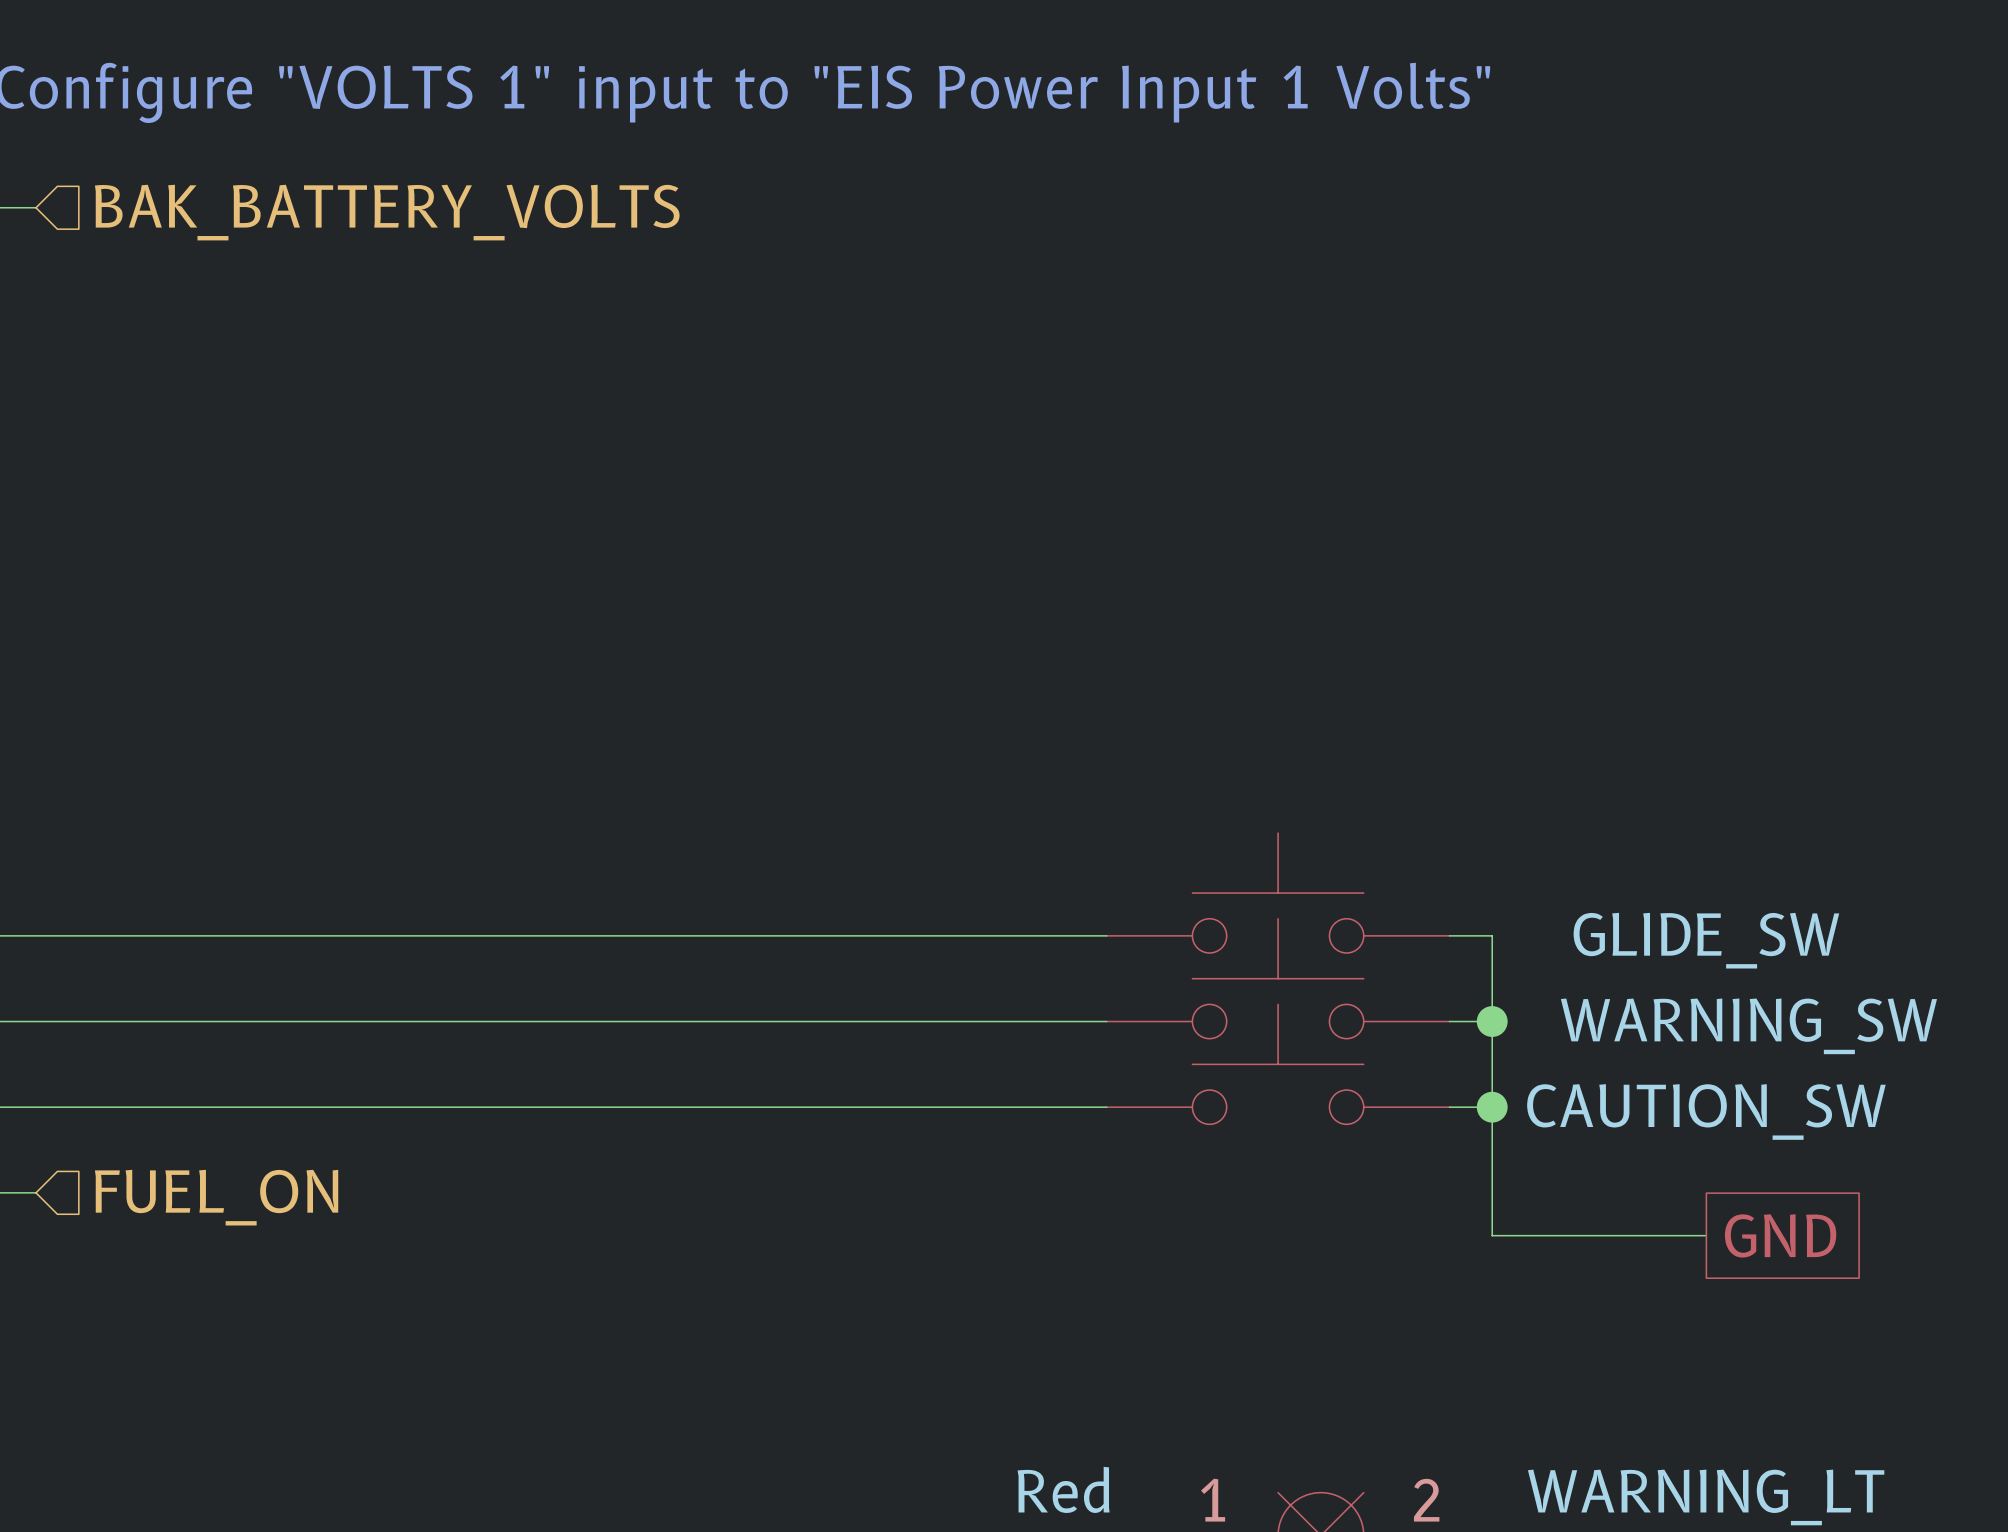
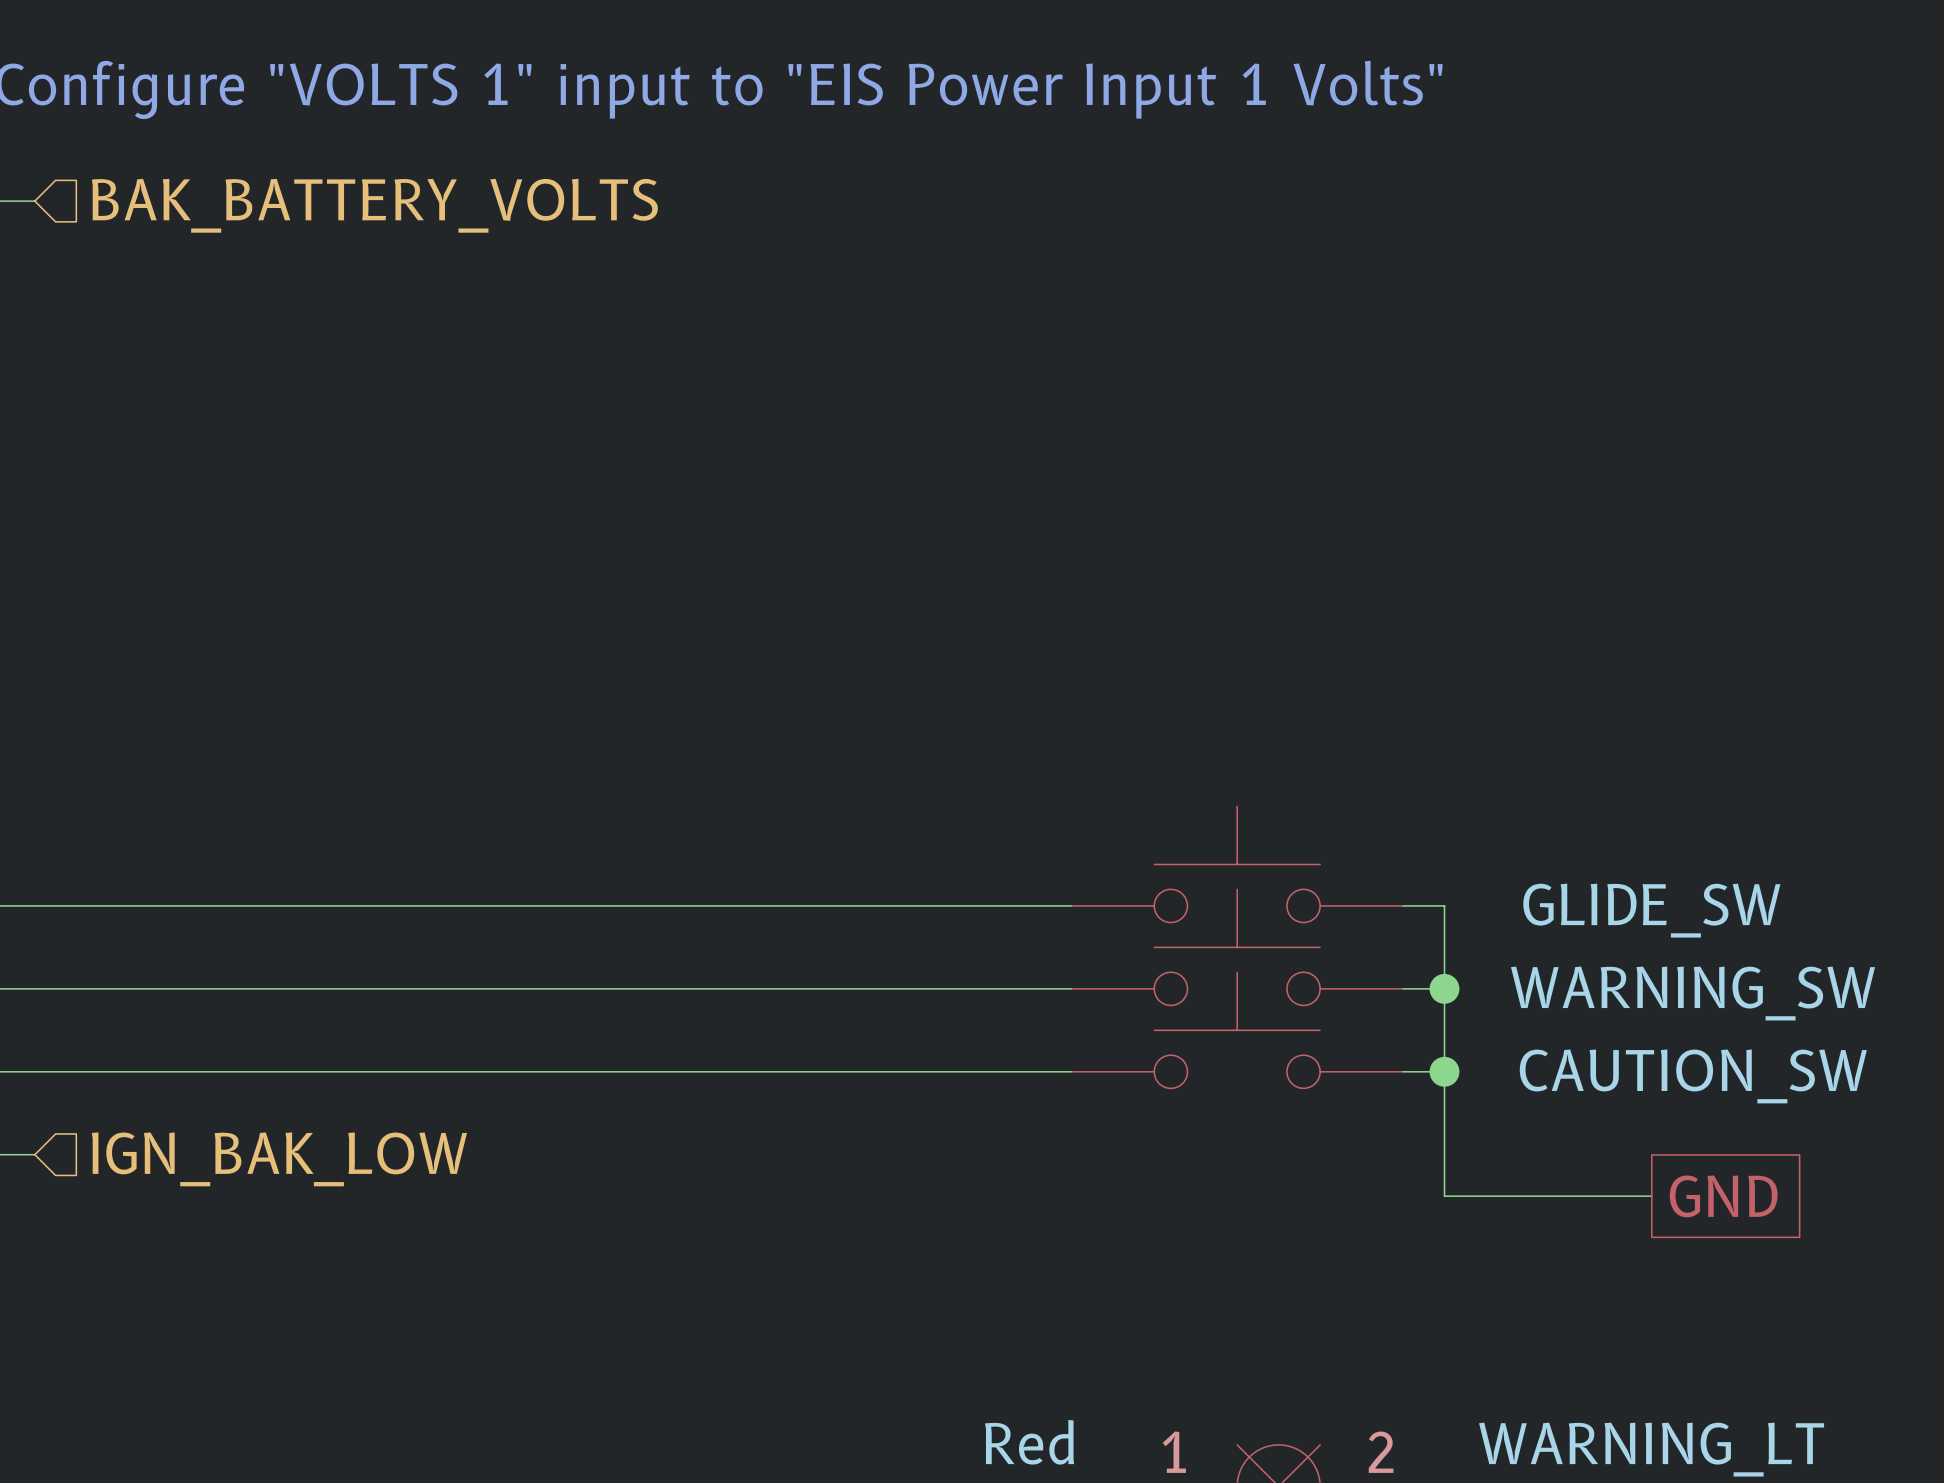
CAUTION_SW name position: CAUTION_SW (1706, 1112) -> CAUTION_SW (1693, 1076)
hierarchical label: FUEL_ON (216, 1197) -> IGN_BAK_LOW (279, 1159)

